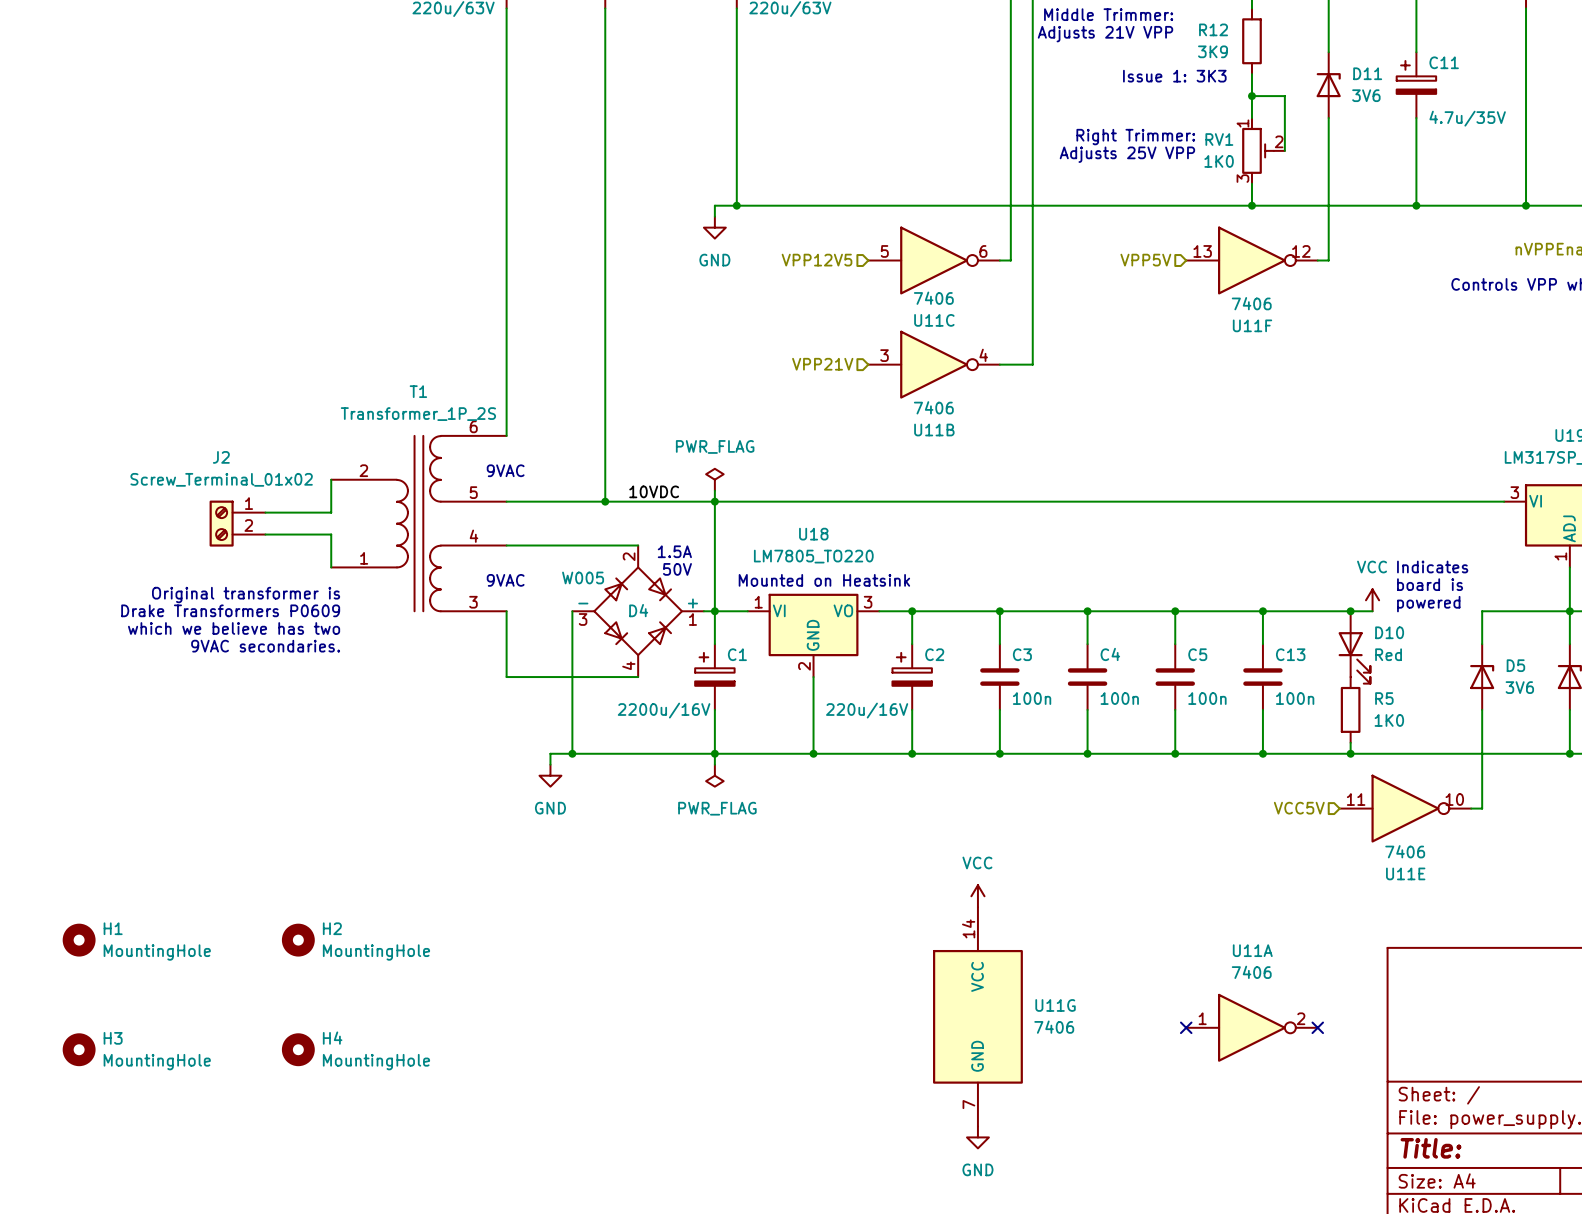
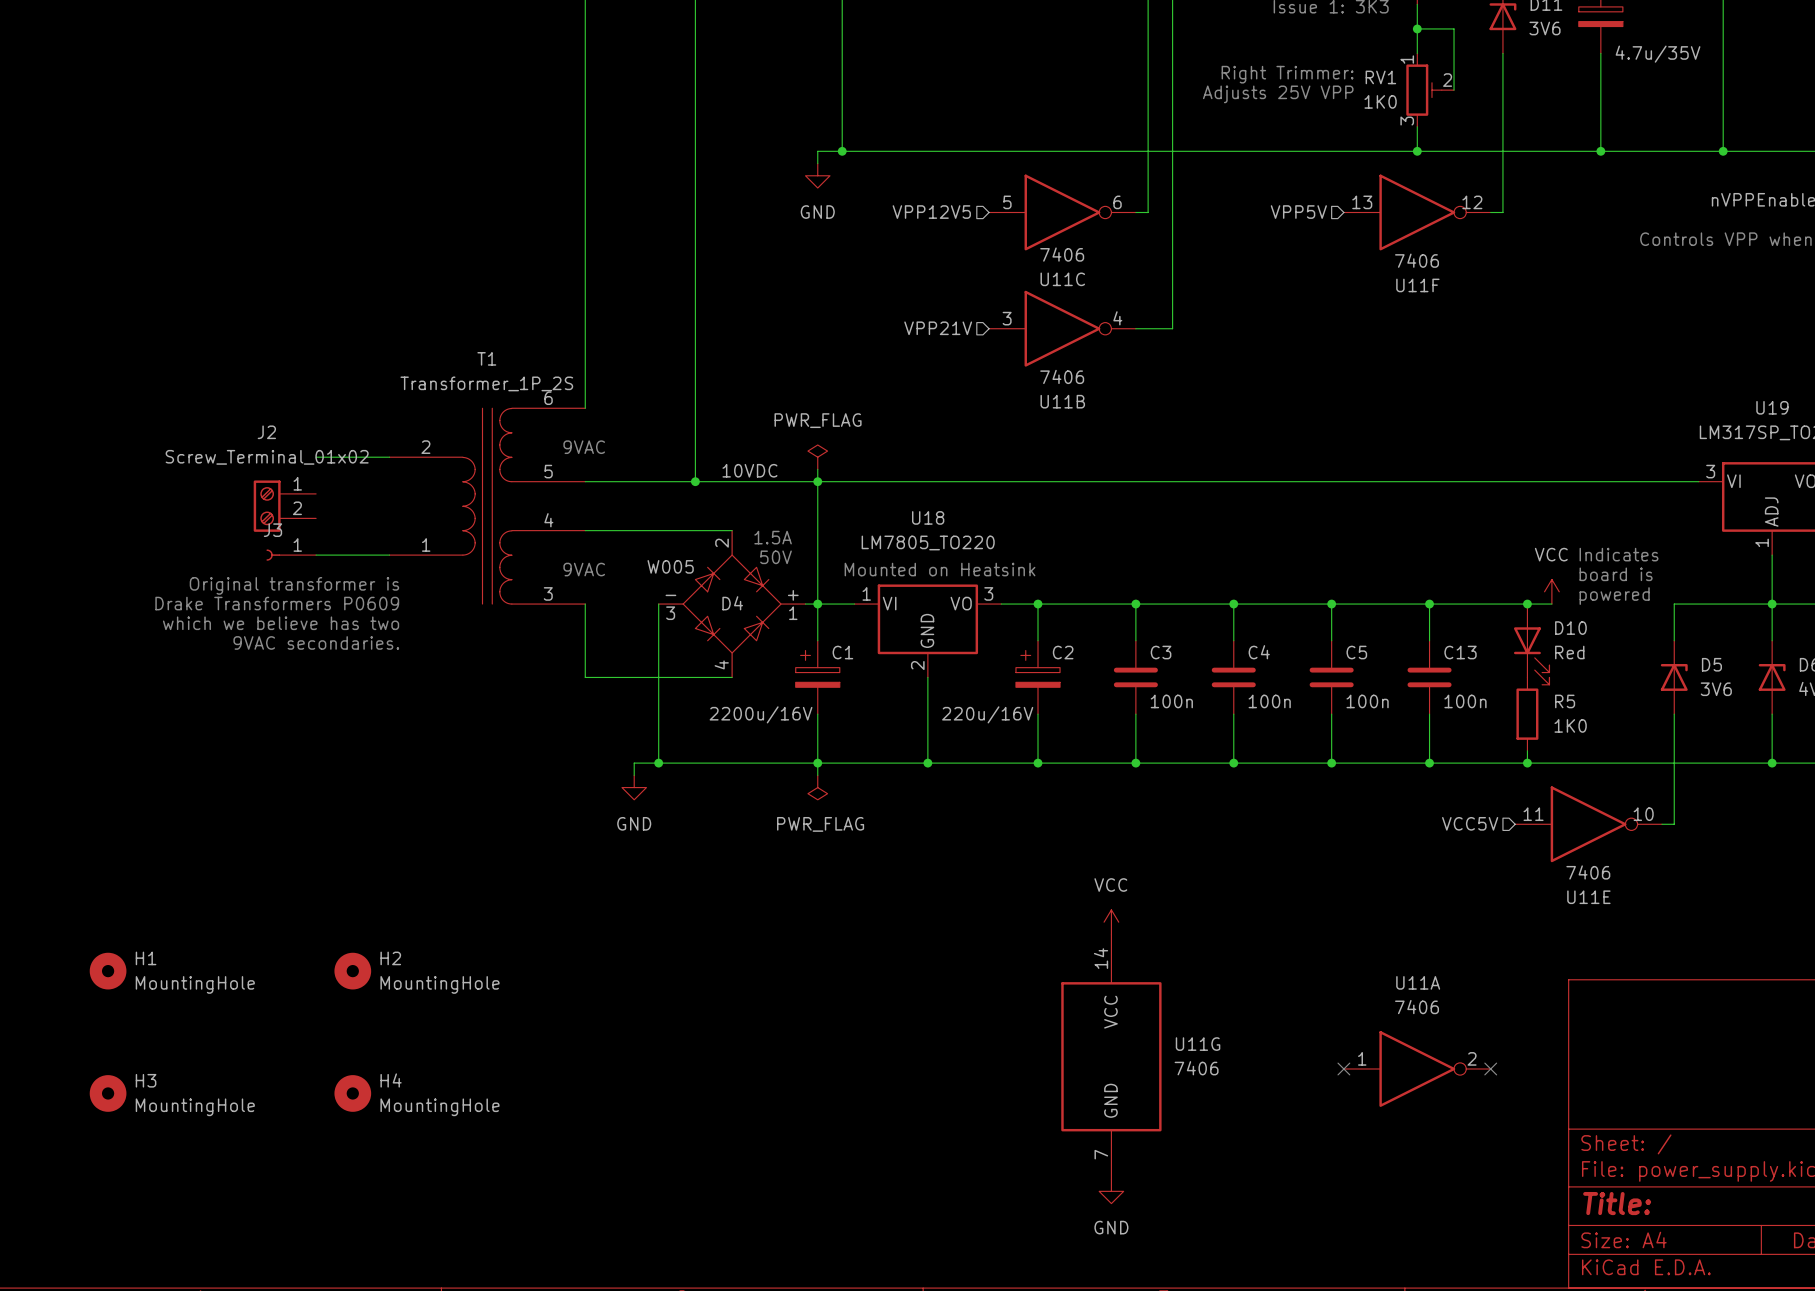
wire: (331, 479) (331, 512) (265, 512) -> (389, 457) (316, 457)
wire: (265, 534) (331, 534) (331, 567) -> (316, 555) (389, 555)
J3: none -> (291, 555)

